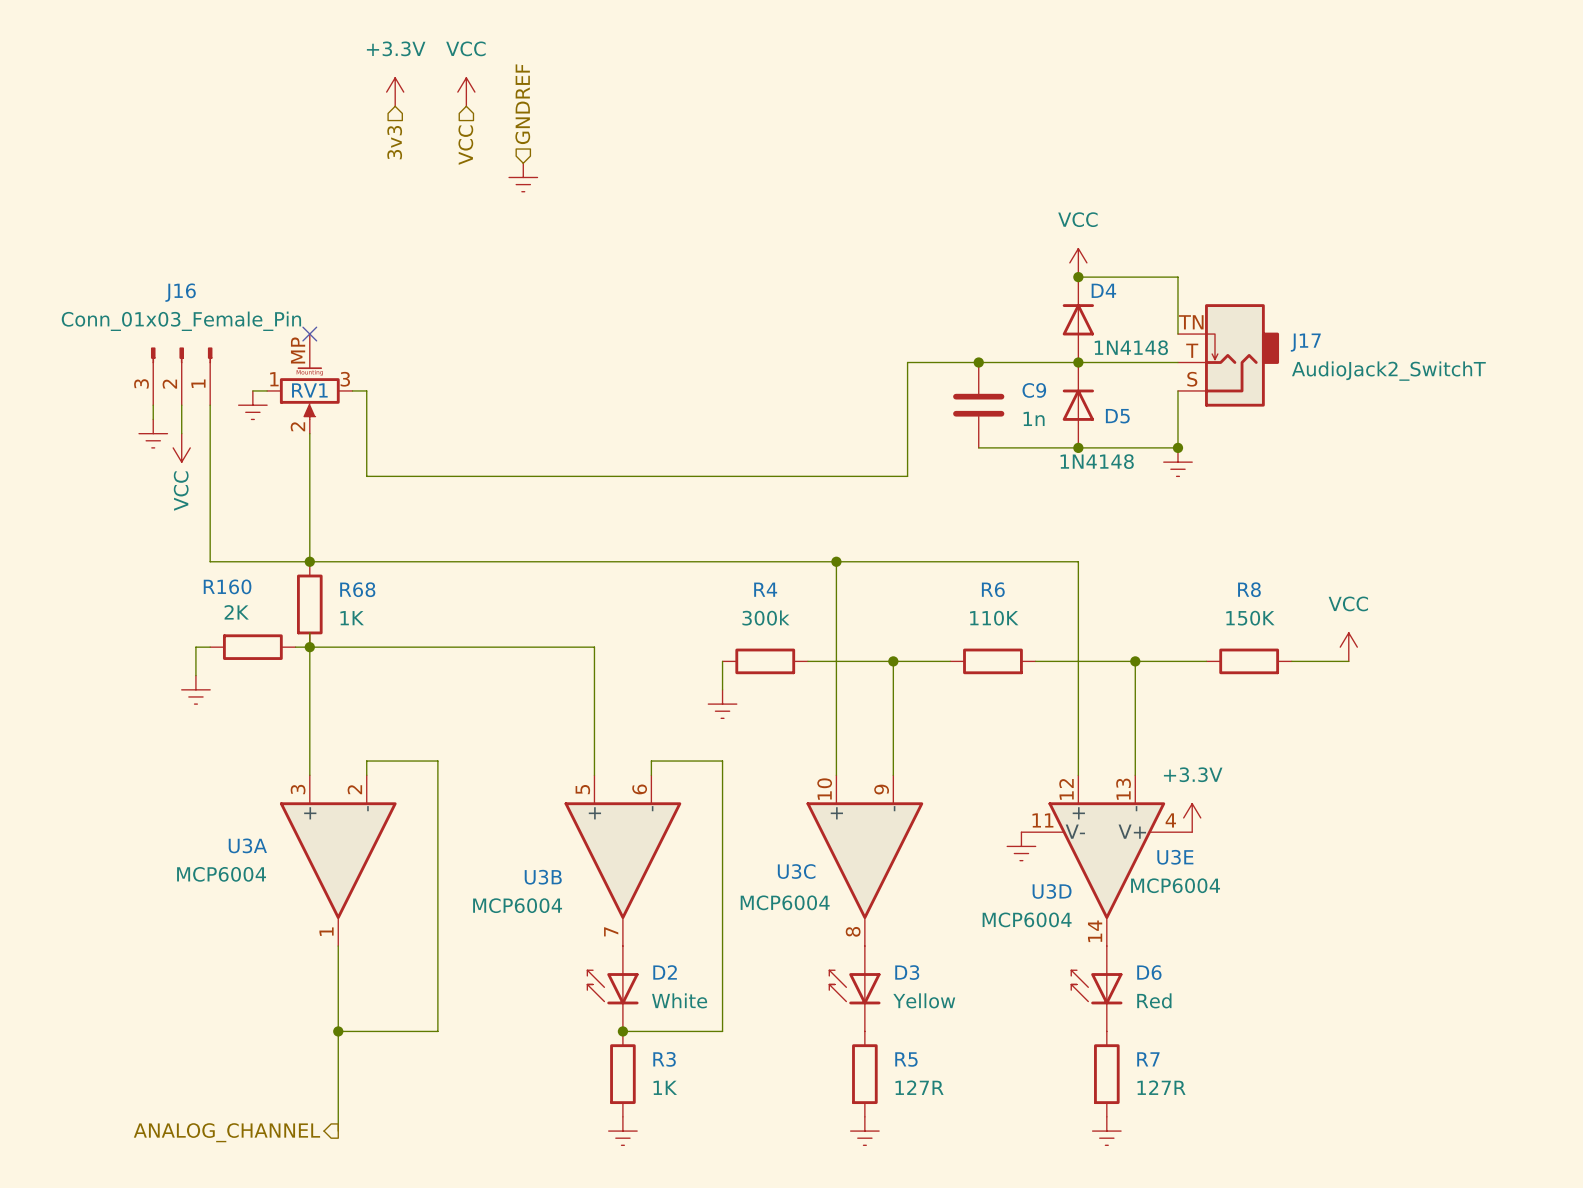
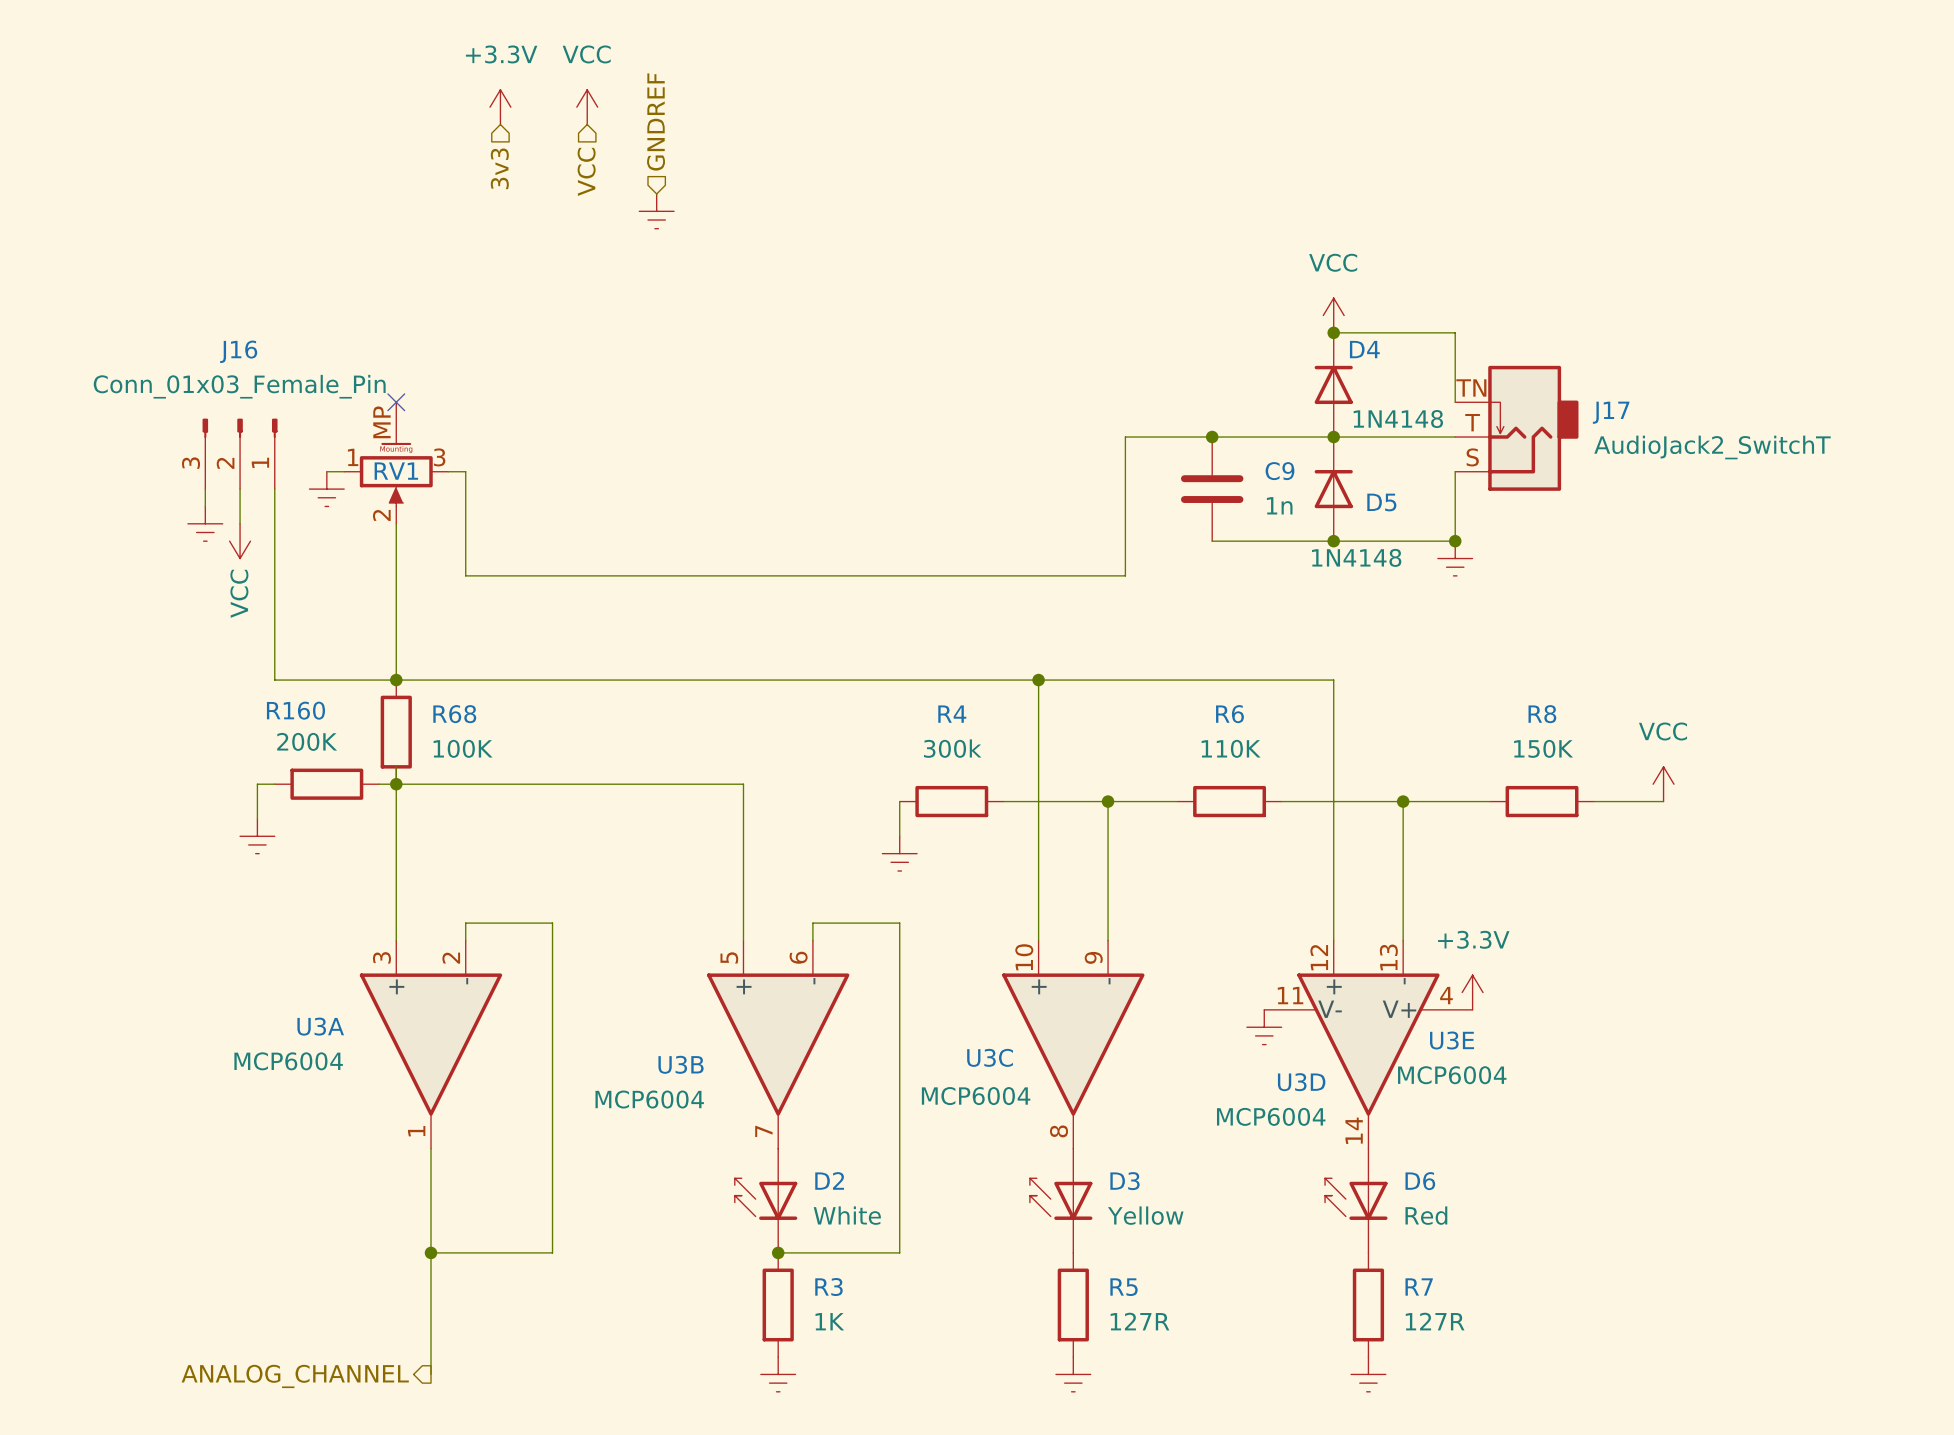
R160 value: 2K (236, 612) -> 200K (307, 741)
R68 value: 1K (352, 618) -> 100K (463, 748)

